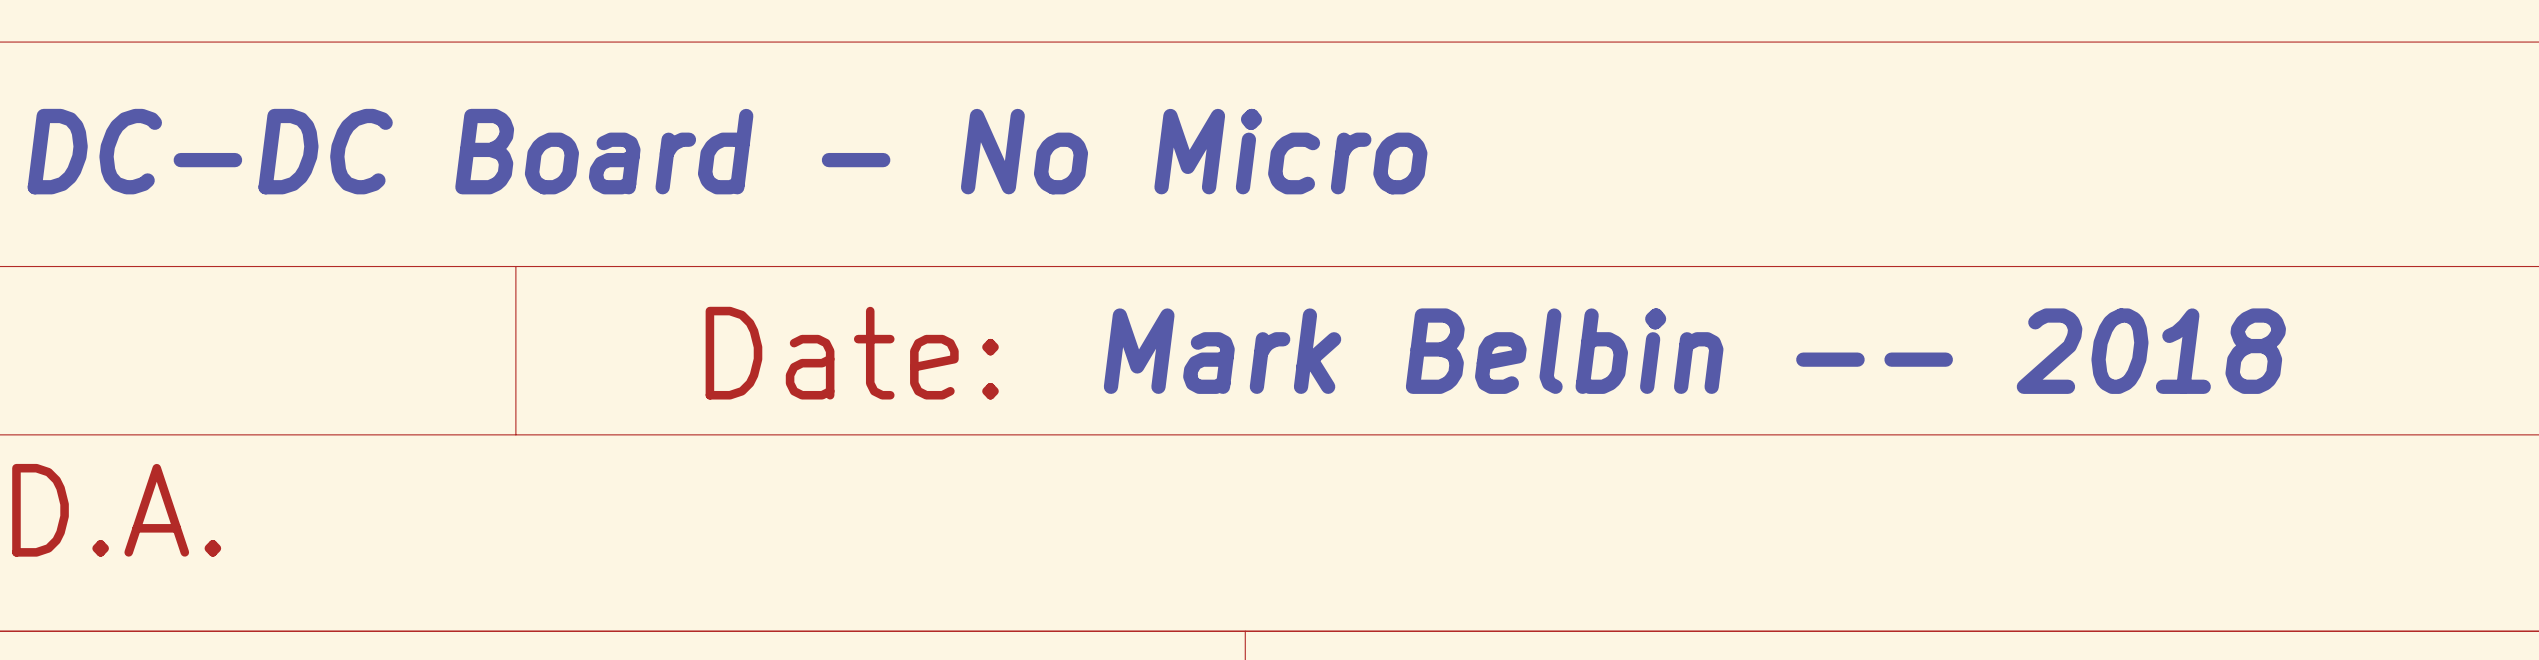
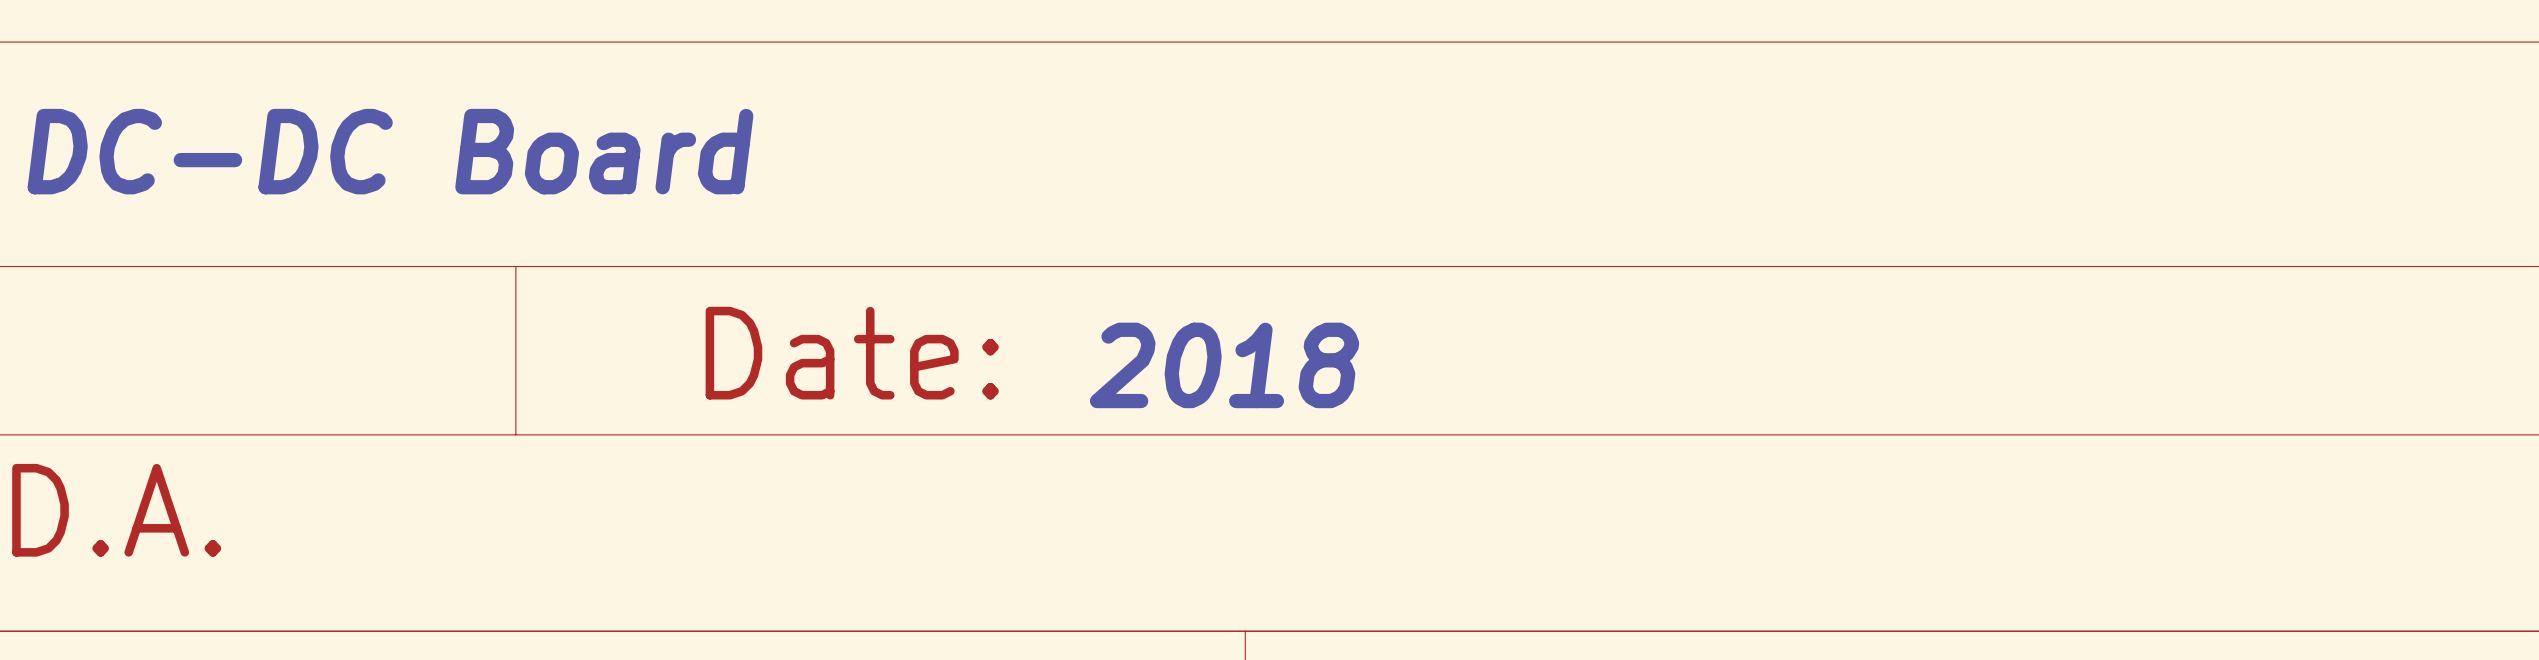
text: DC-DC Board - No Micro (727, 151) -> DC-DC Board (390, 151)
text: Mark Belbin -- 2018 (1694, 351) -> 2018 (1224, 365)

